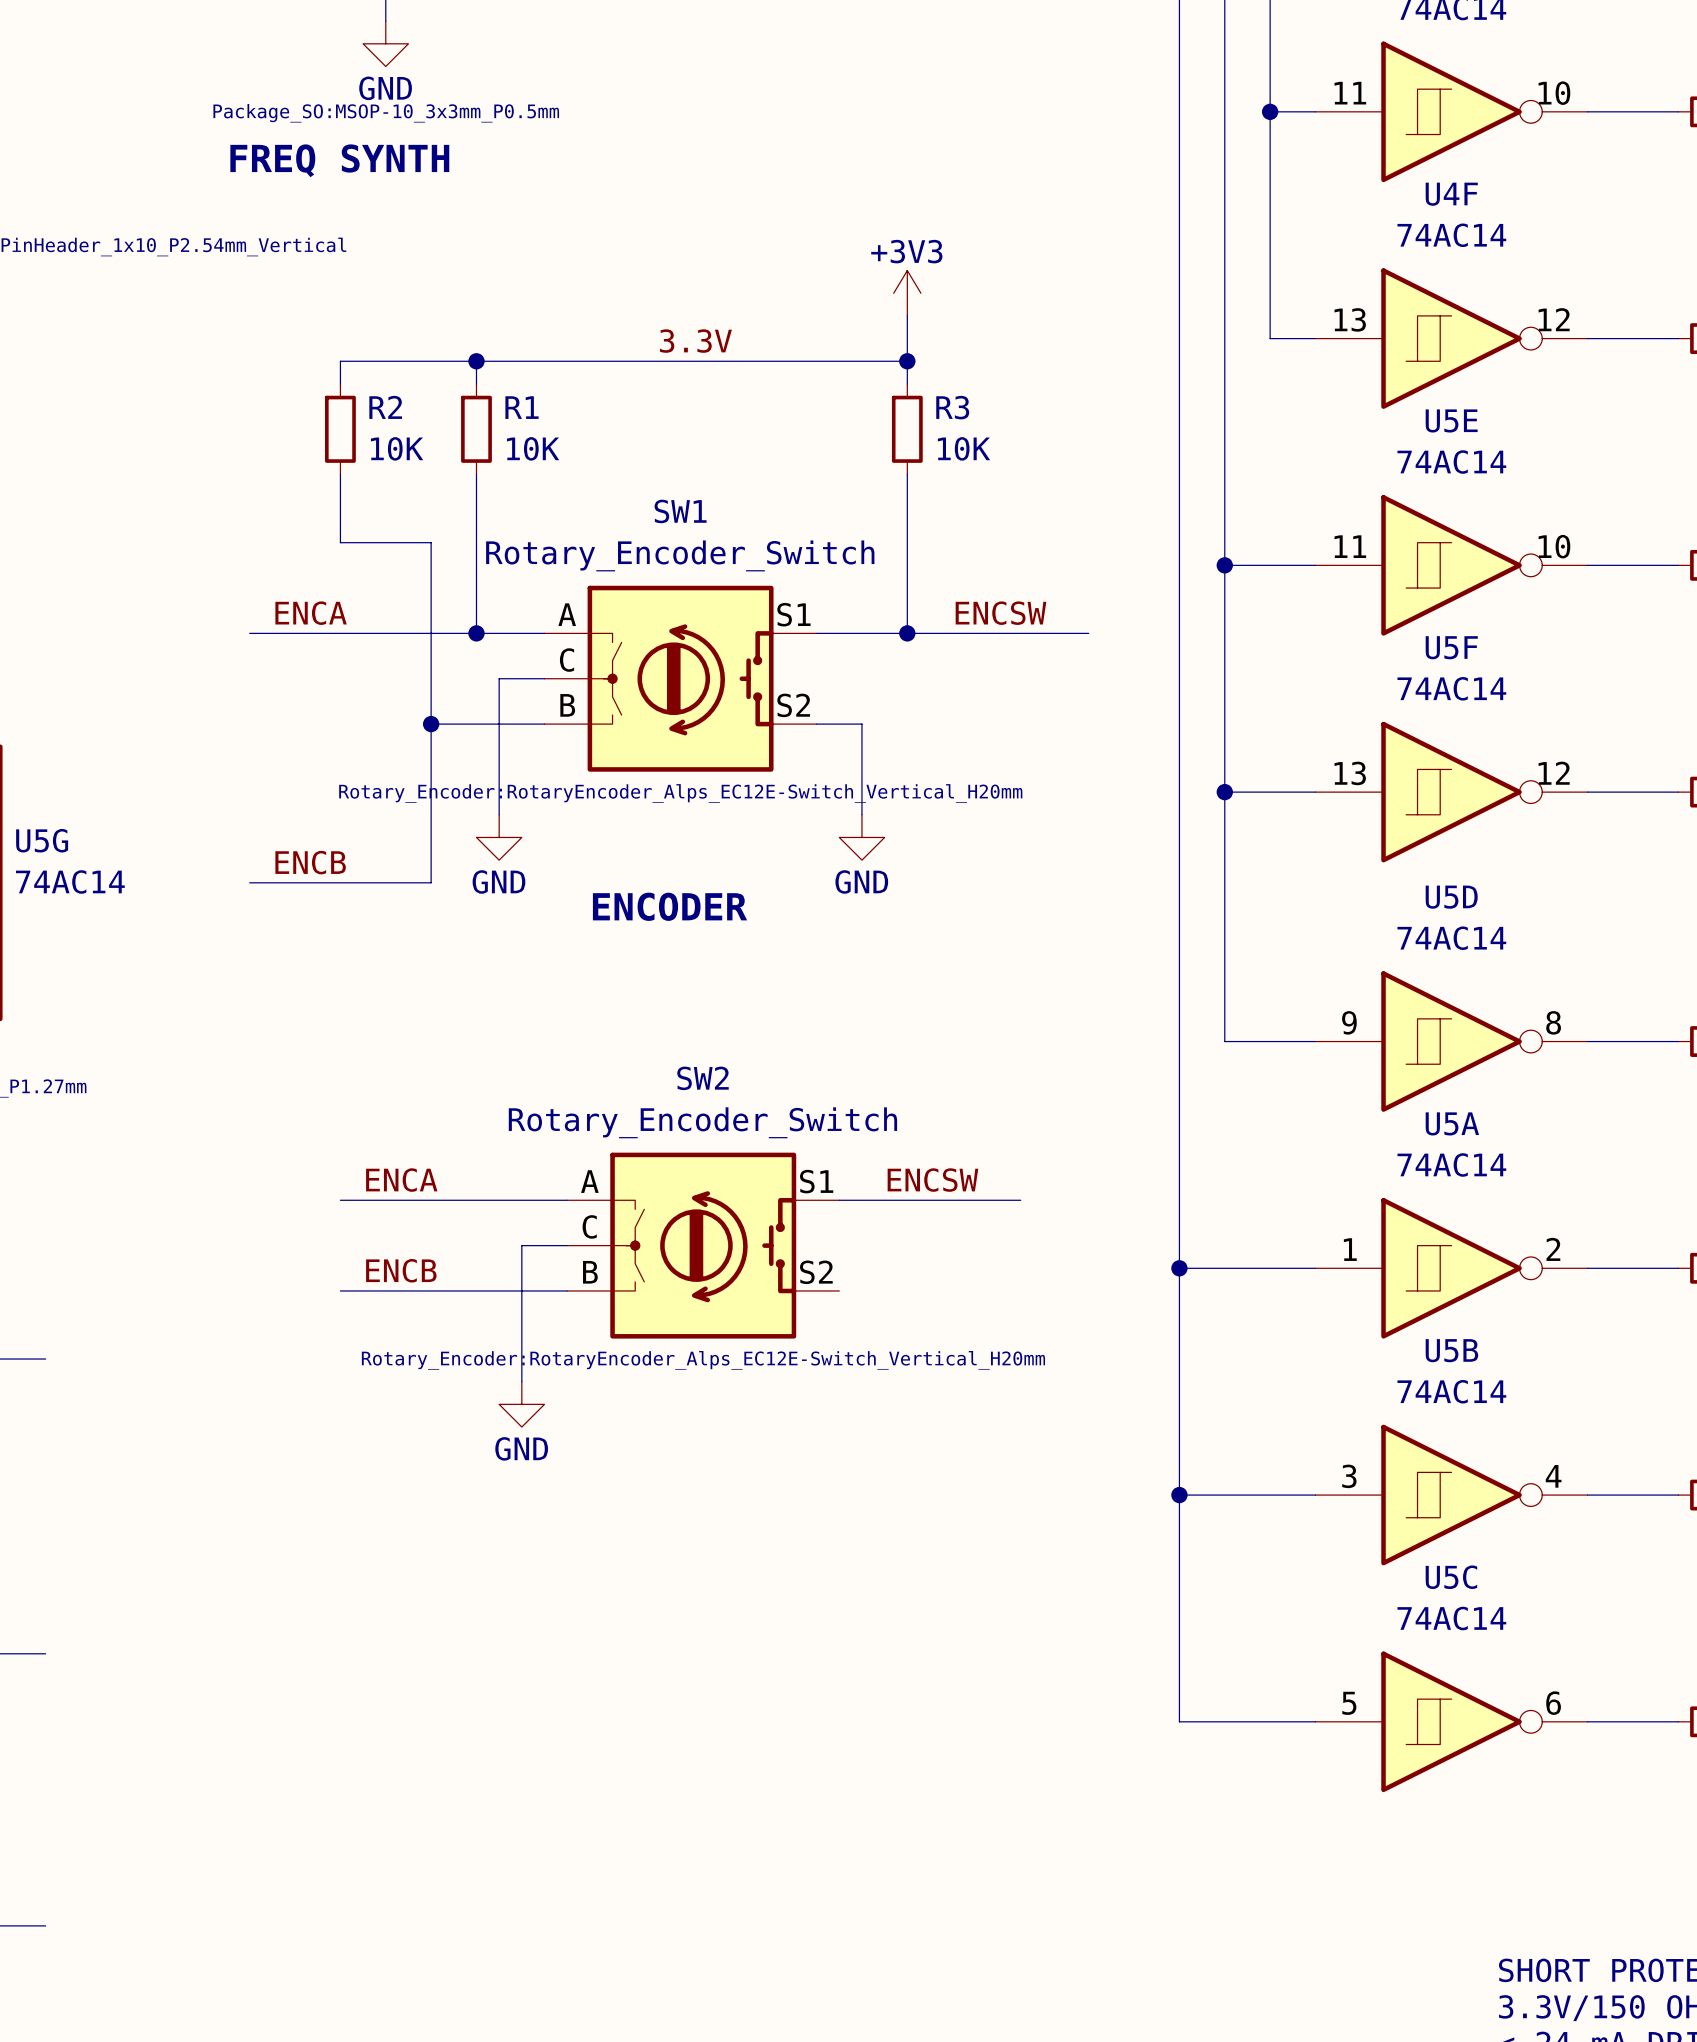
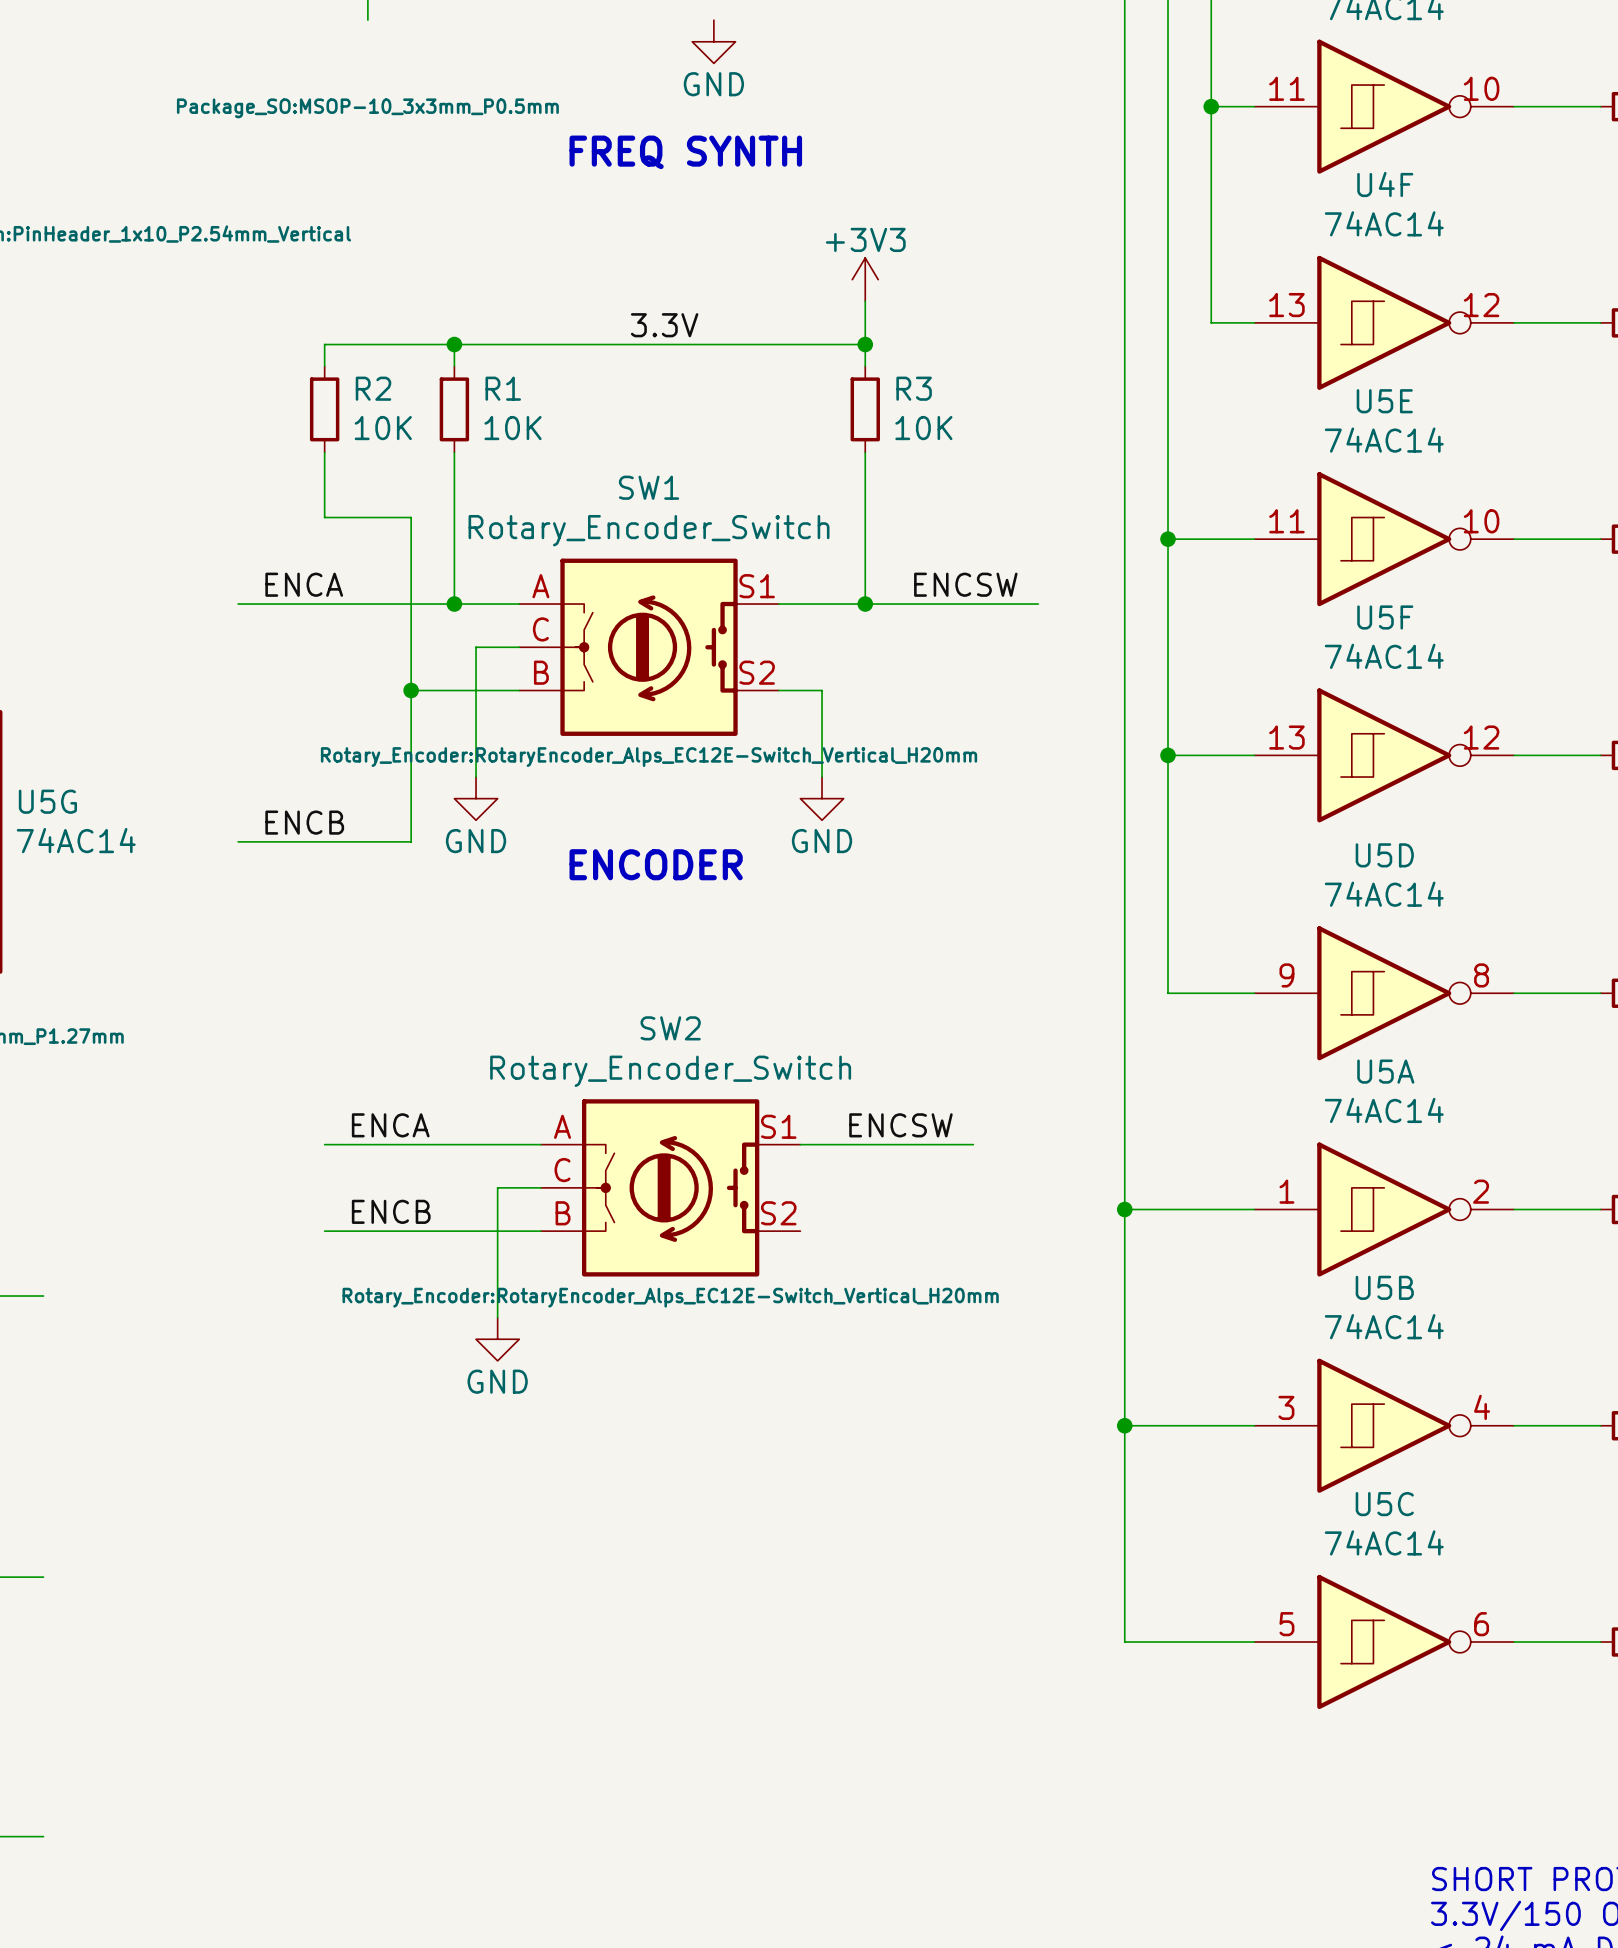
power symbol position: GND (385, 43) -> GND (713, 41)
text position: FREQ SYNTH (339, 160) -> FREQ SYNTH (685, 152)

